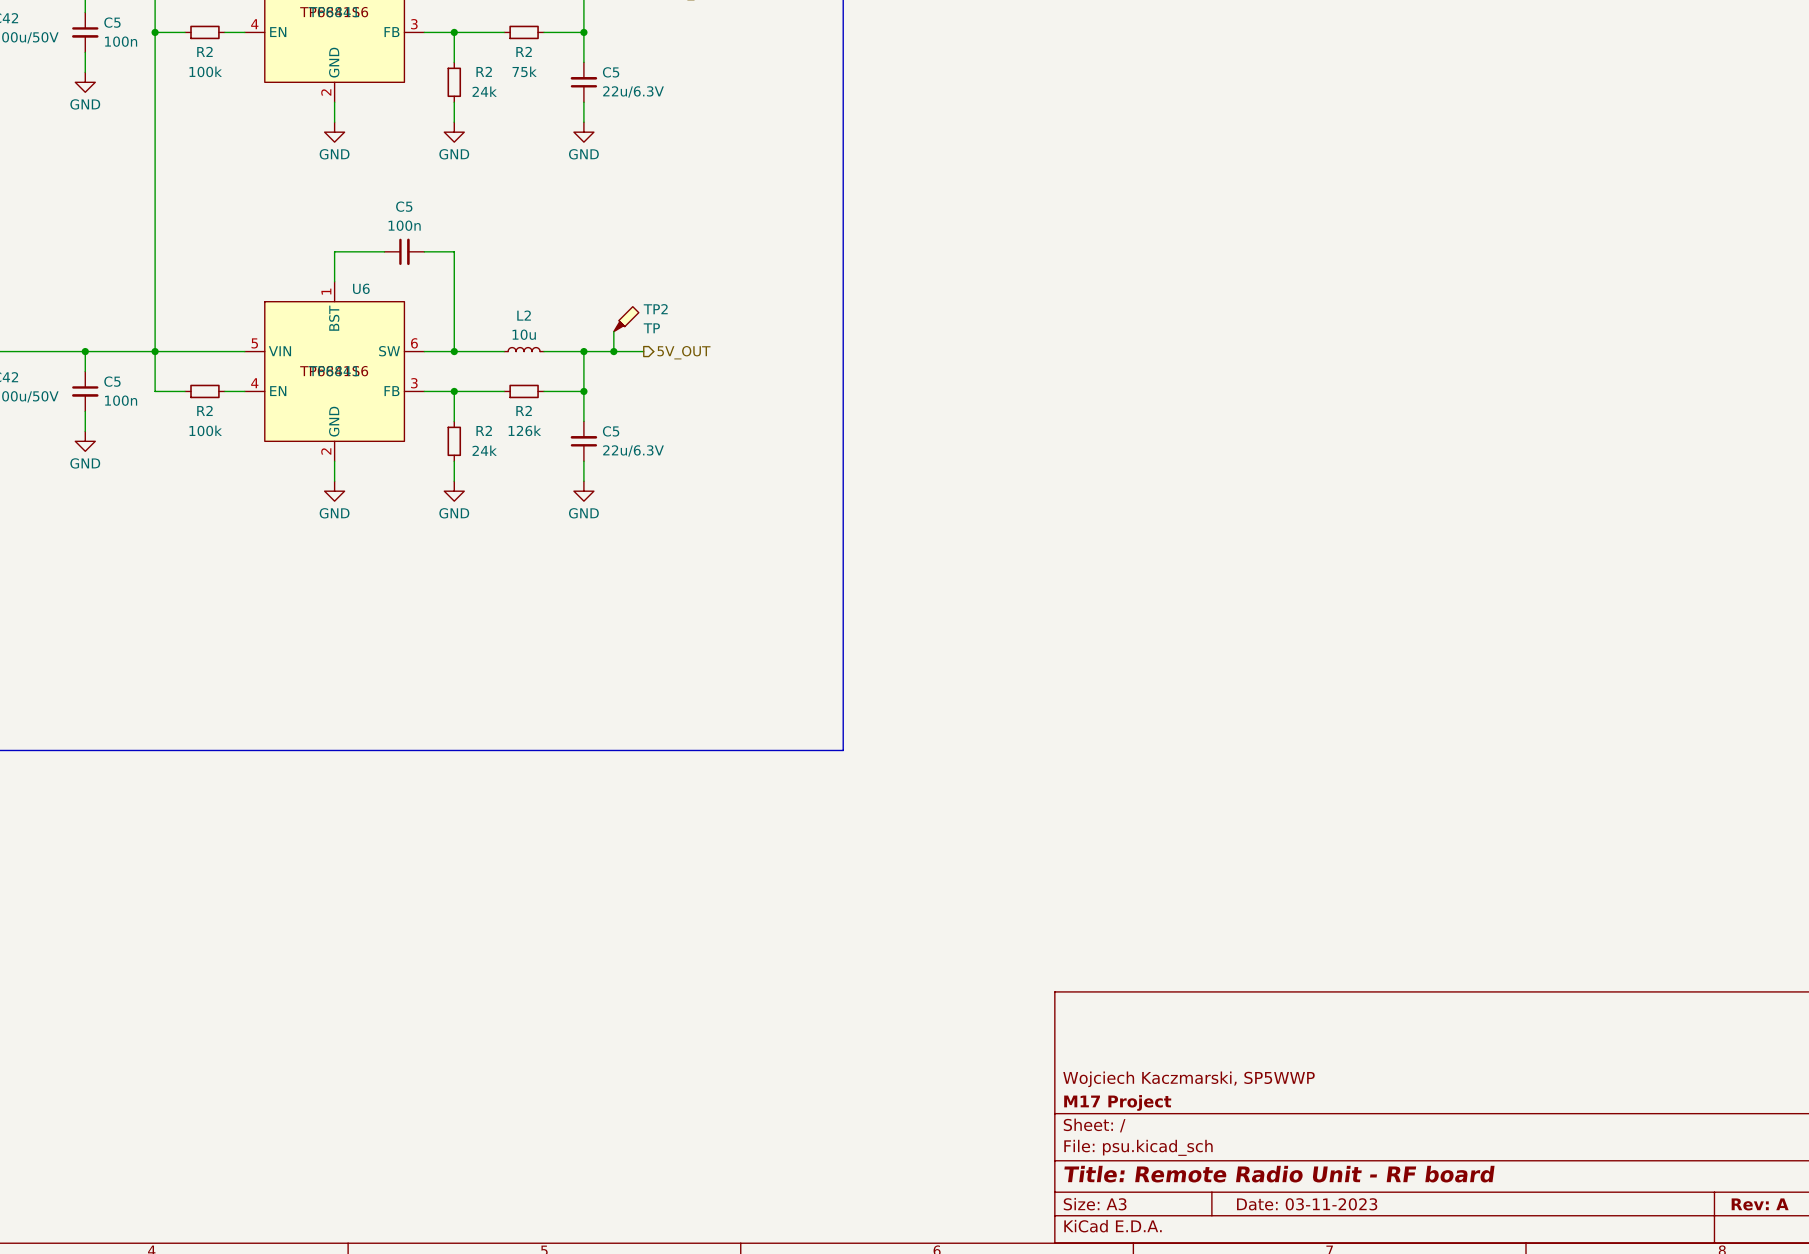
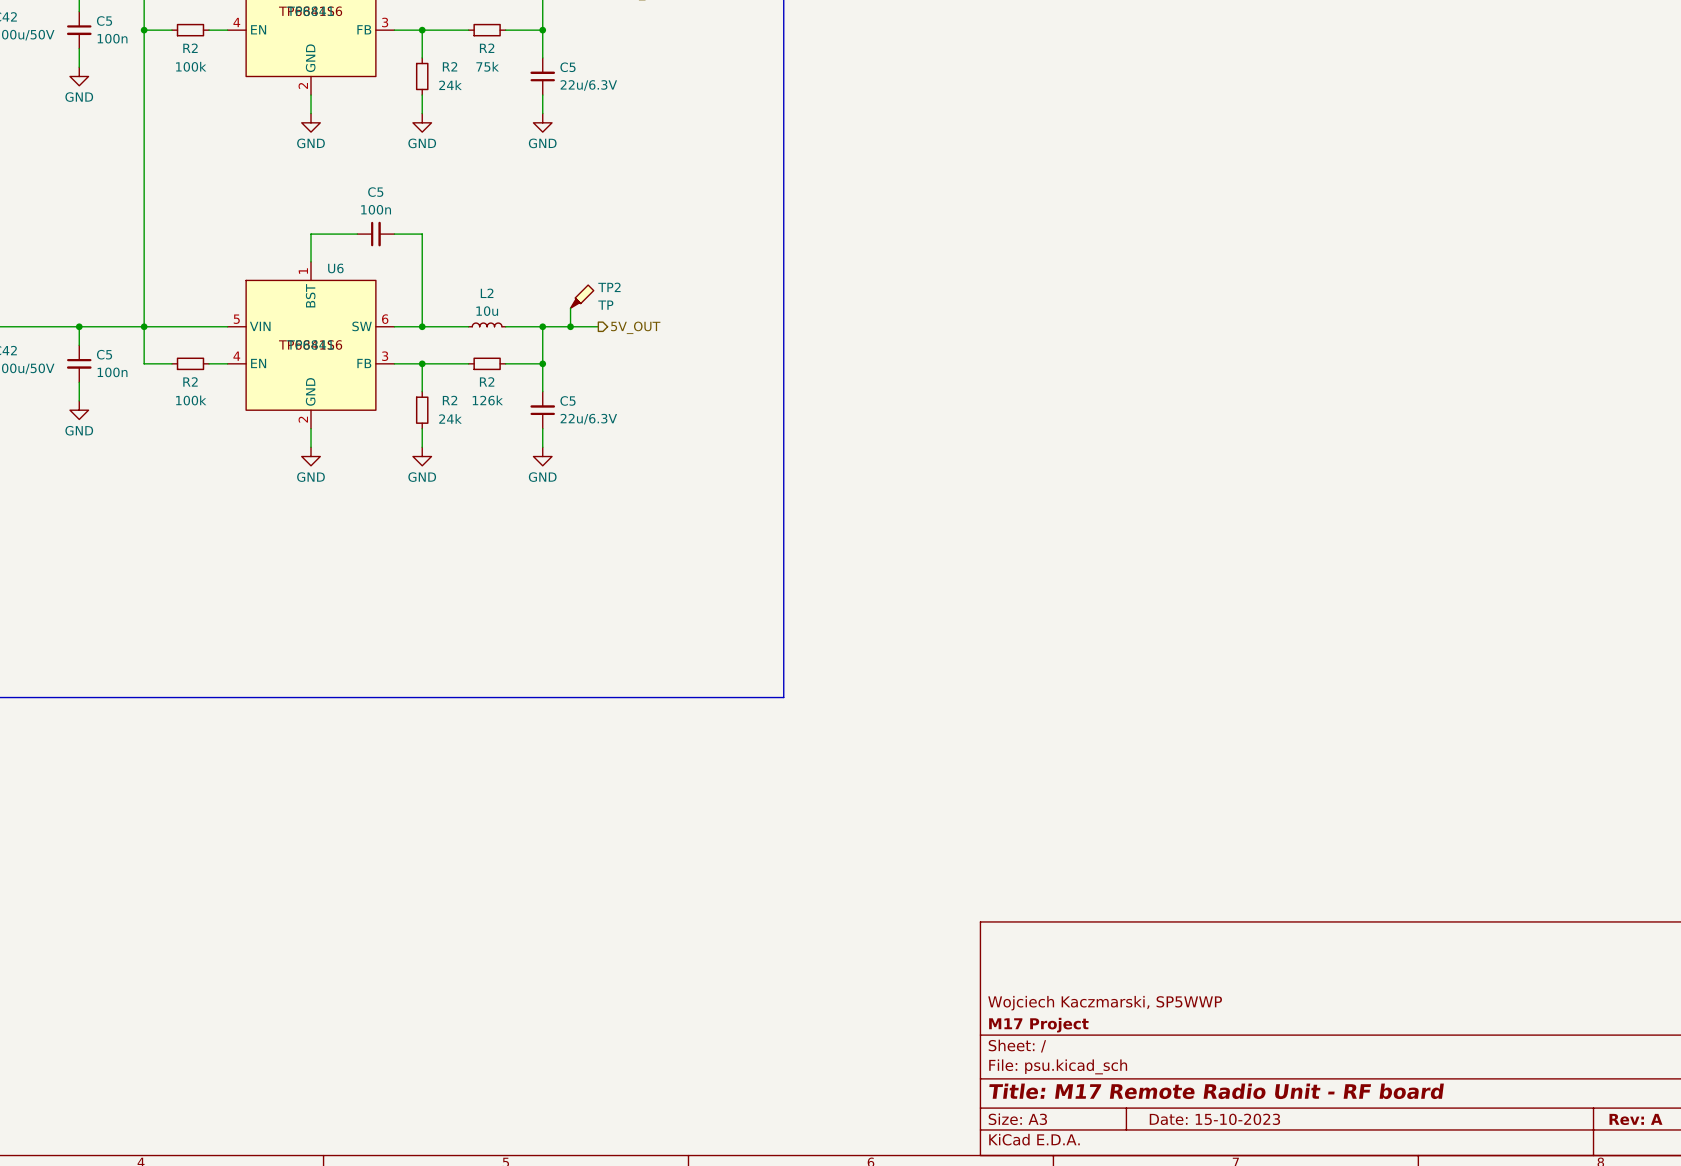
title block: Title: Remote Radio Unit - RF board (1279, 1174) -> Title: M17 Remote Radio Unit - RF board (1216, 1091)
title block: Date: 03-11-2023 (1307, 1204) -> Date: 15-10-2023 (1214, 1119)

